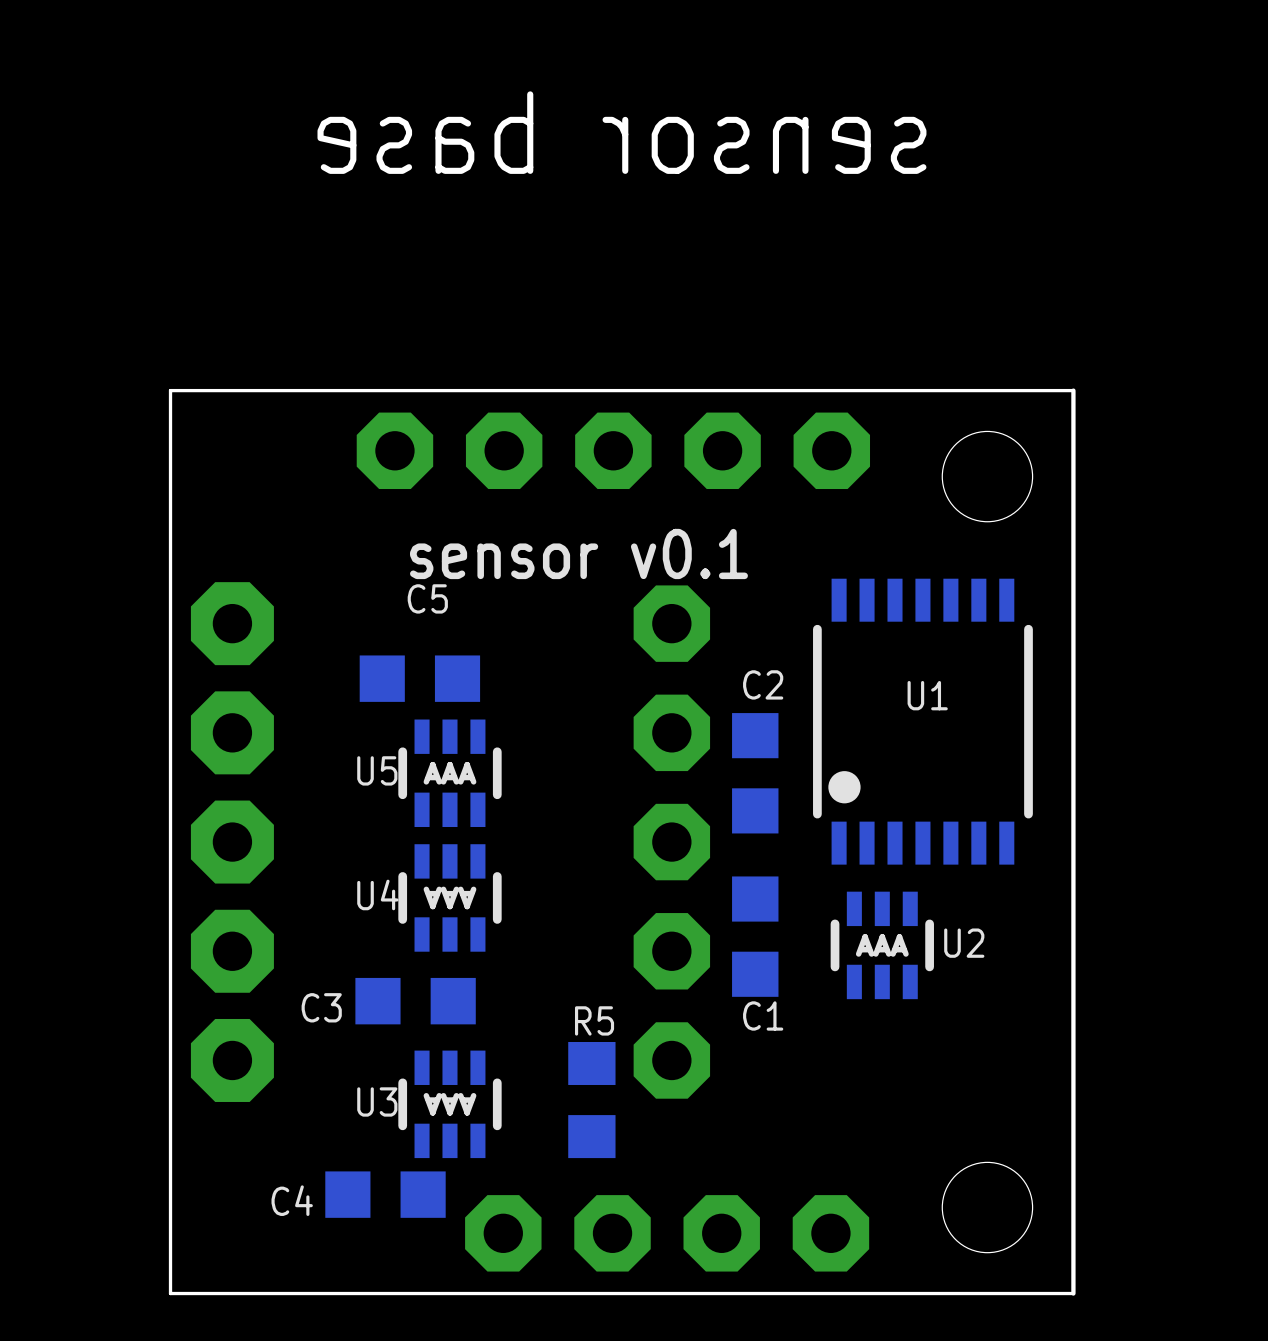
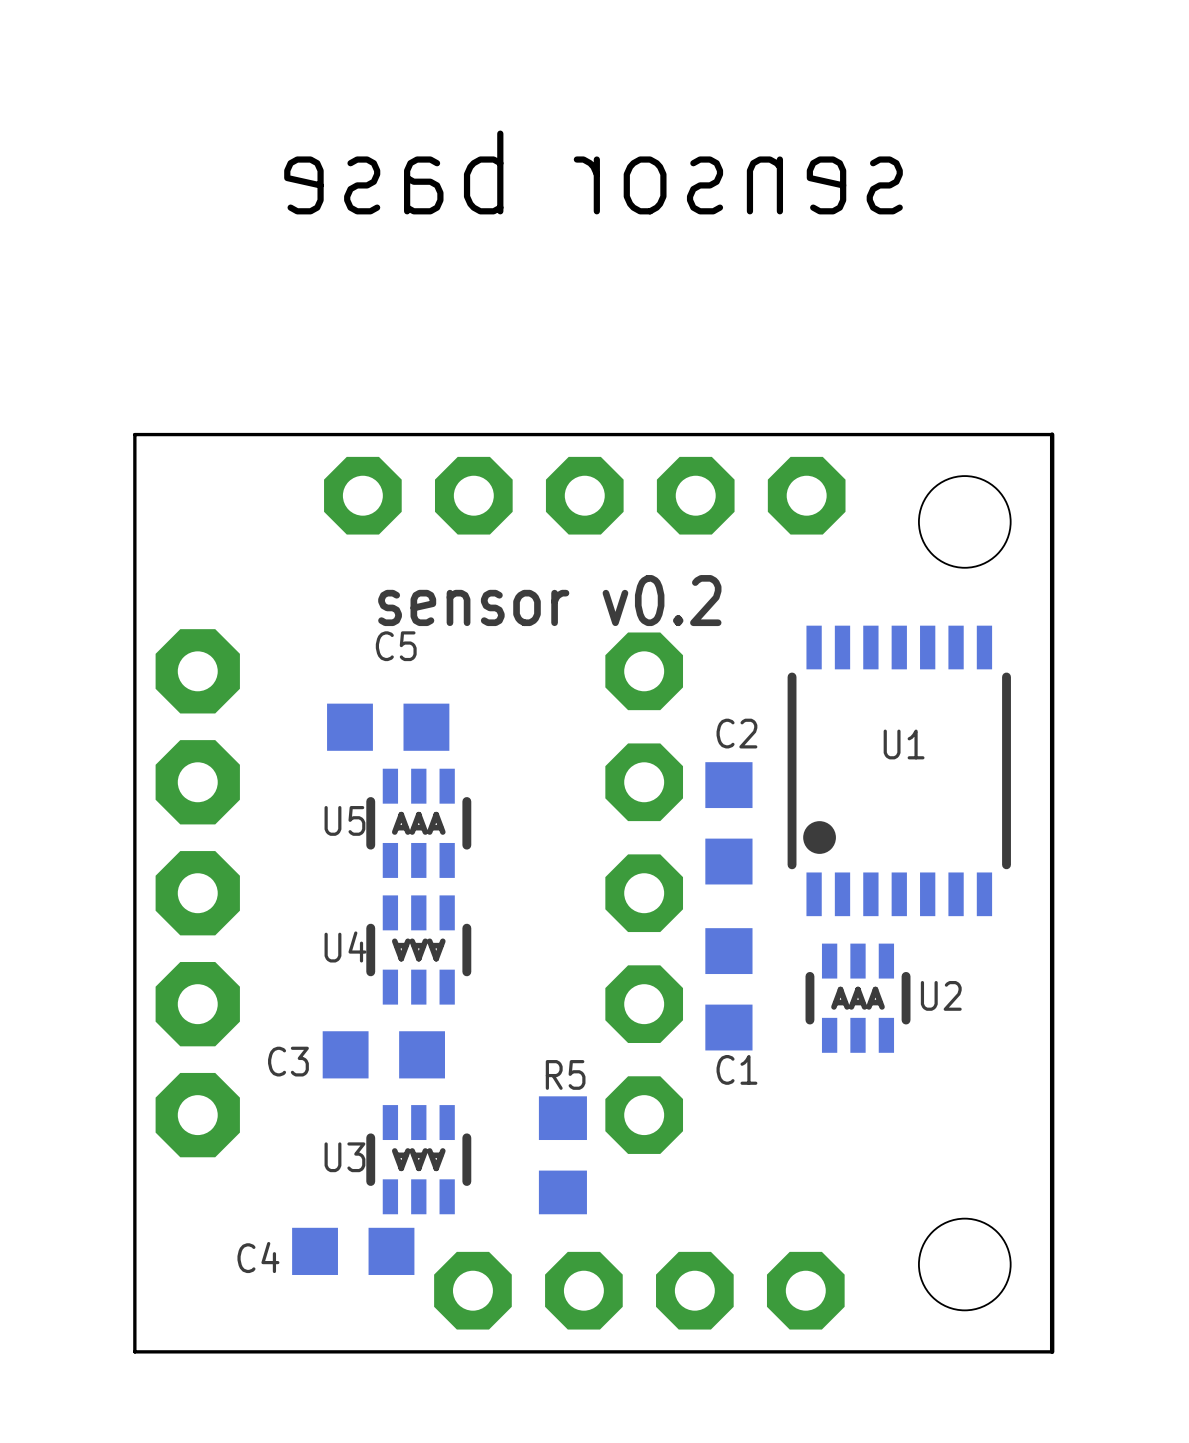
text: sensor v0.1 (578, 553) -> sensor v0.2 (549, 600)

